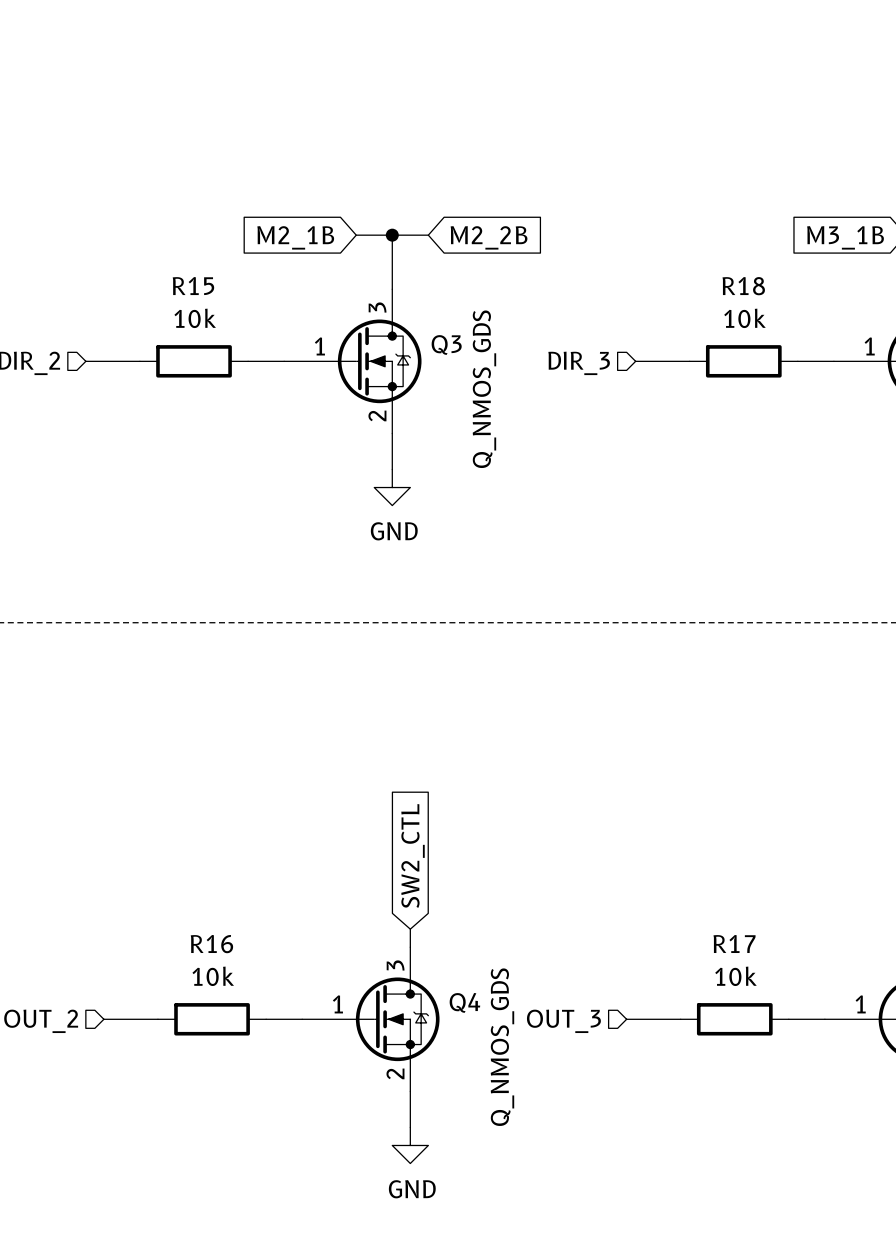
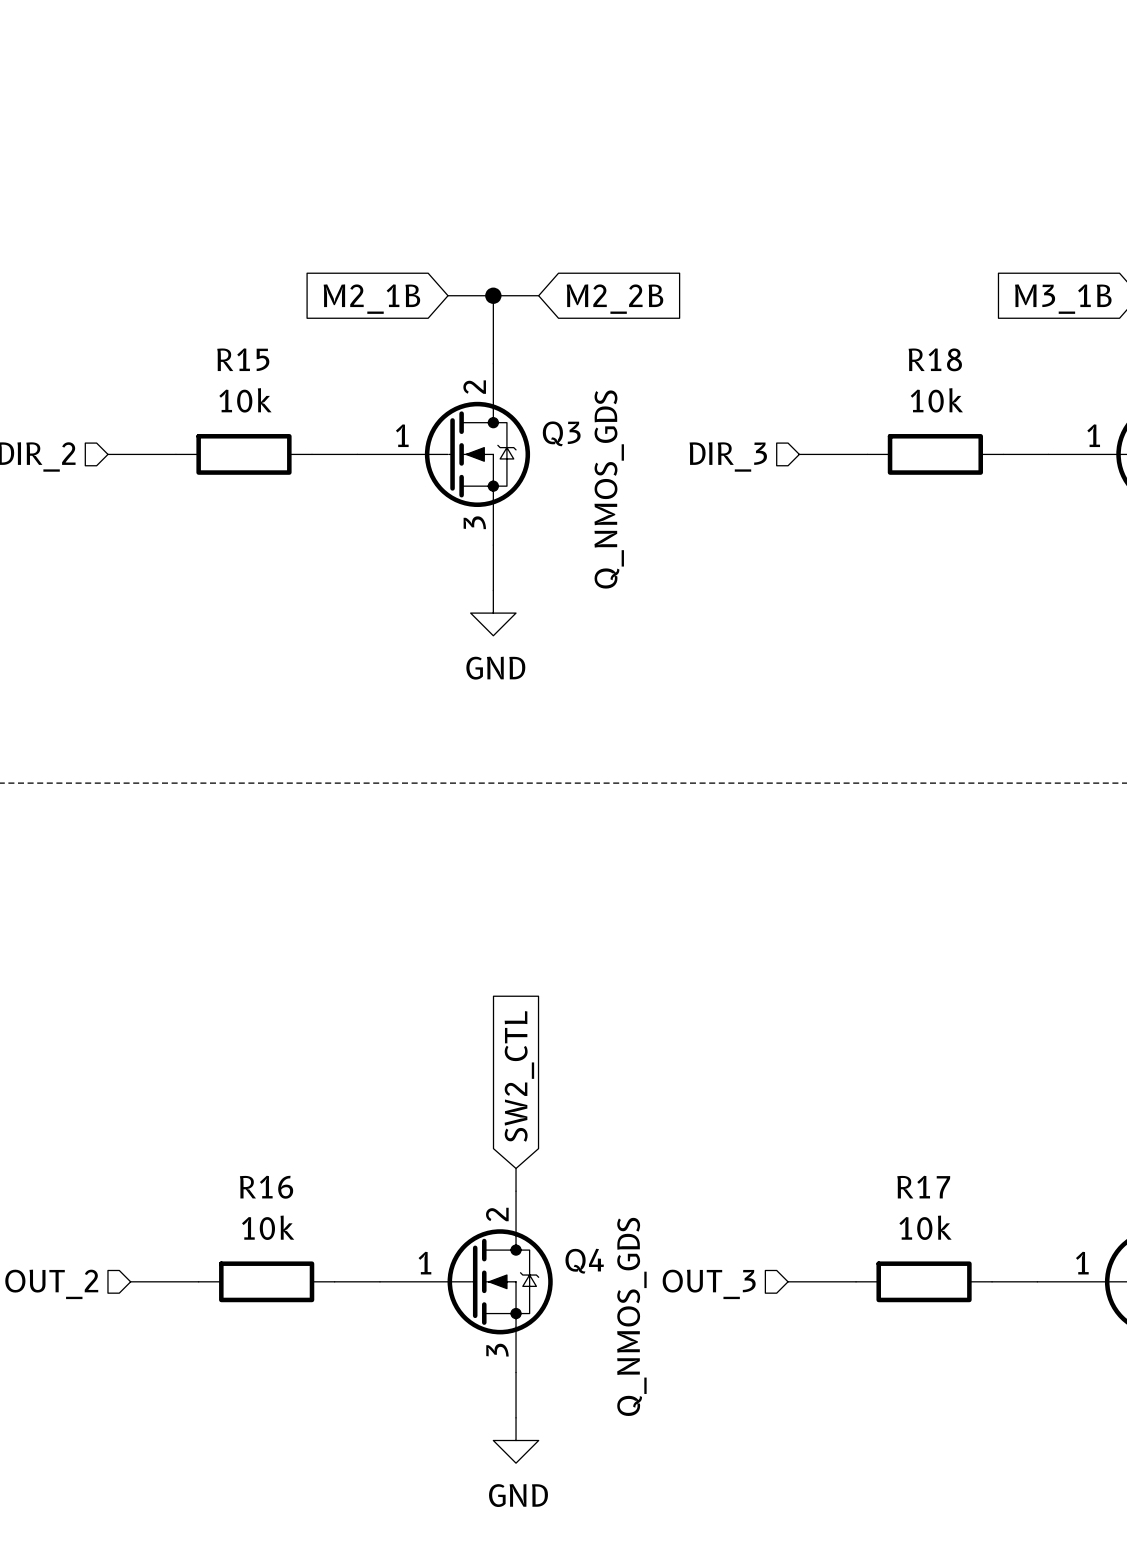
Q3 pin number: 3 (377, 307) -> 2 (474, 387)
Q3 pin number: 2 (377, 415) -> 3 (474, 522)
Q4 pin number: 3 (395, 965) -> 2 (497, 1214)
Q4 pin number: 2 (395, 1073) -> 3 (497, 1350)

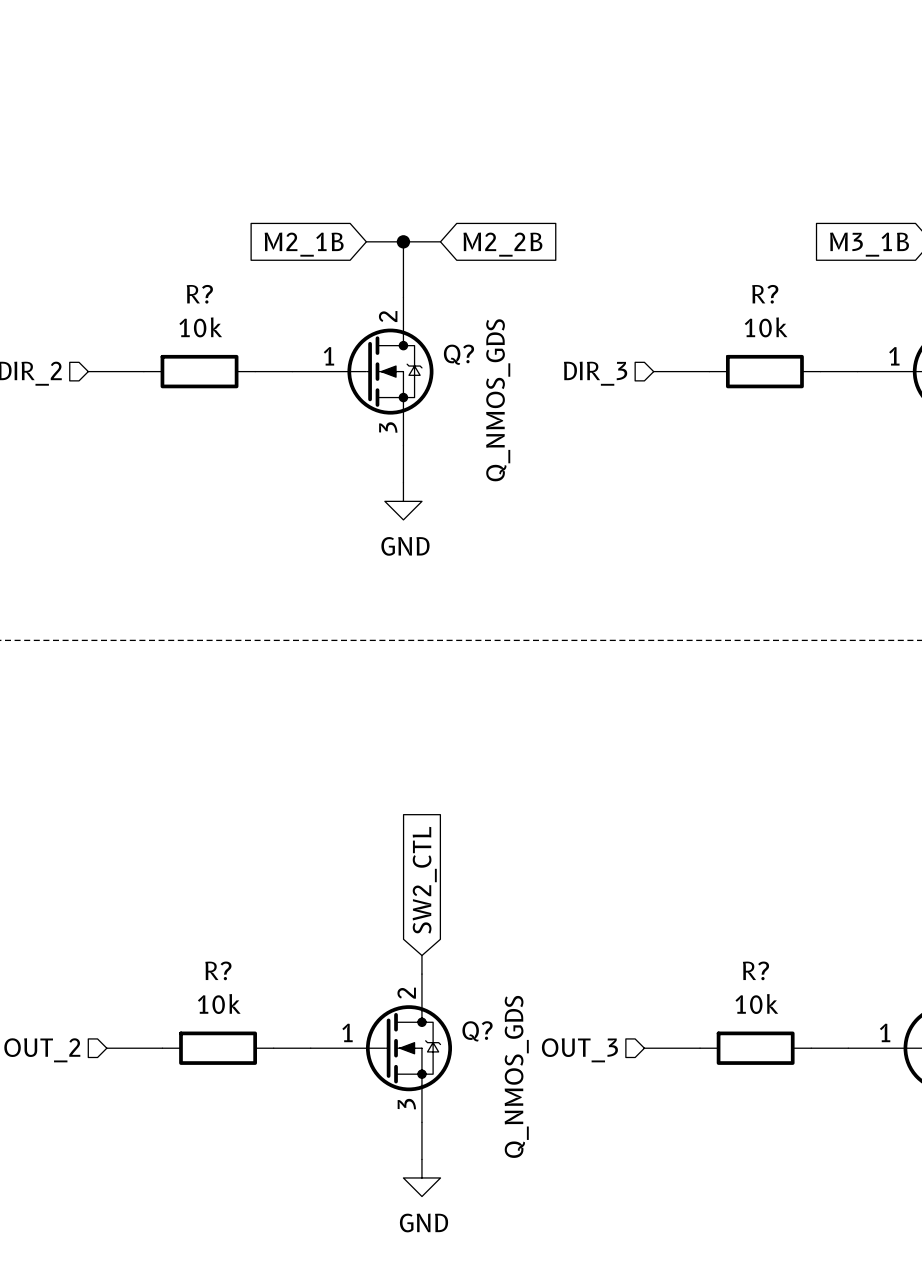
R15 name: R15 (243, 359) -> R? (199, 294)
R18 name: R18 (935, 359) -> R? (765, 294)
Q3 name: Q3 (561, 433) -> Q? (458, 354)
R16 name: R16 (266, 1187) -> R? (218, 970)
R17 name: R17 (923, 1187) -> R? (755, 970)
Q4 name: Q4 (584, 1261) -> Q? (477, 1031)

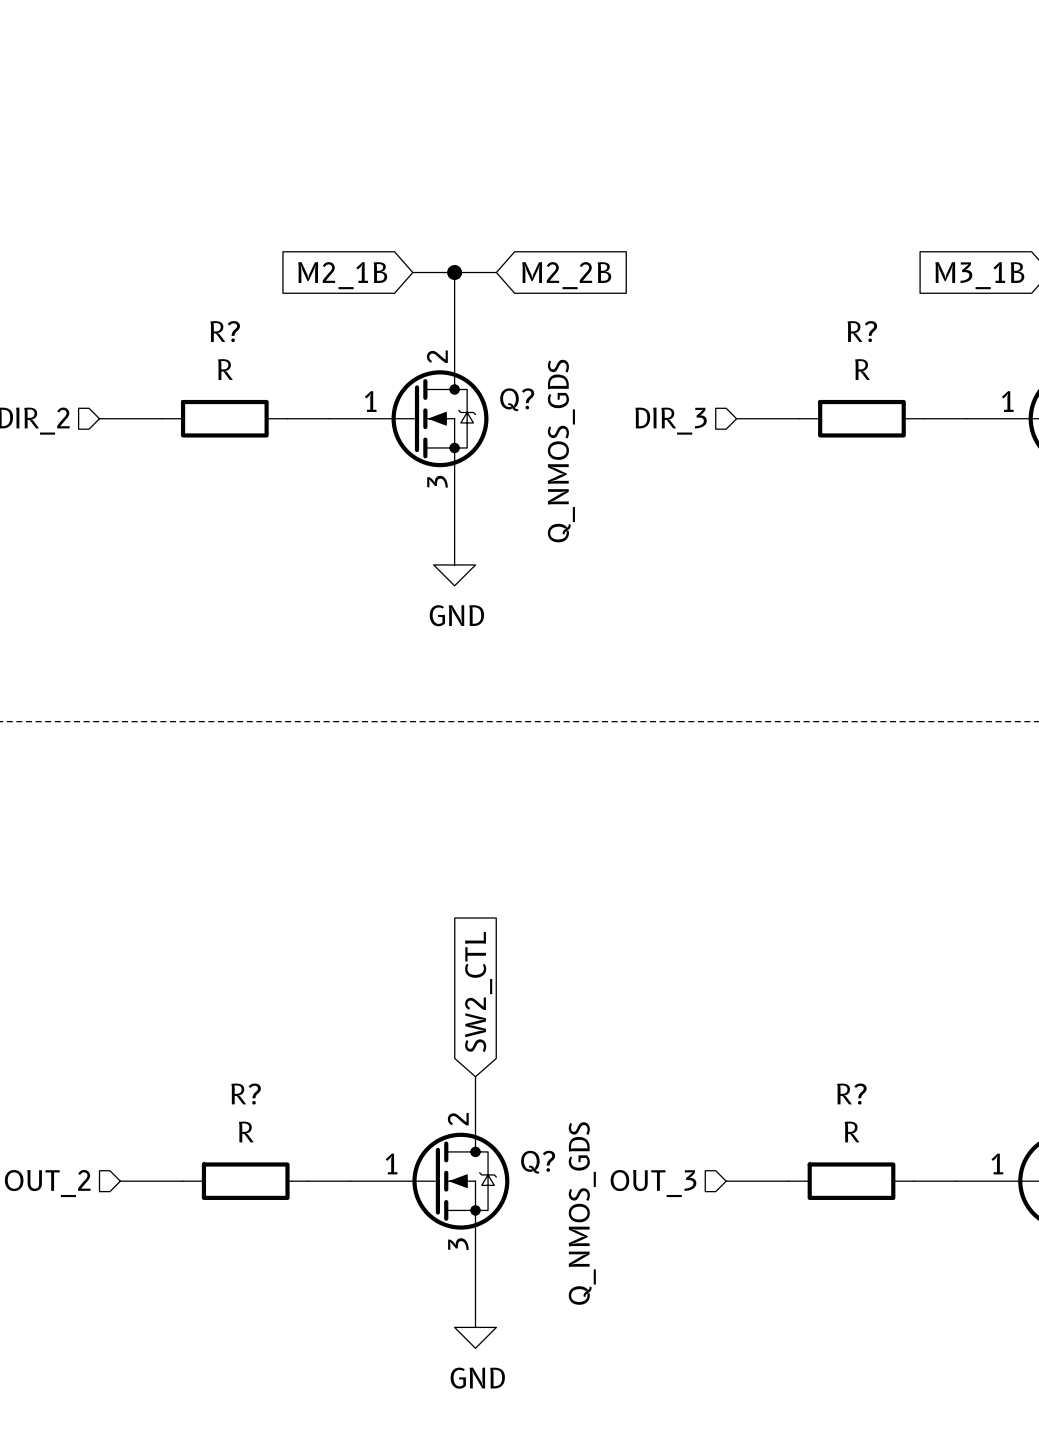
R? value: 10k (200, 327) -> R (225, 369)
R? value: 10k (766, 327) -> R (862, 369)
R? value: 10k (219, 1004) -> R (246, 1132)
R? value: 10k (756, 1004) -> R (852, 1132)

